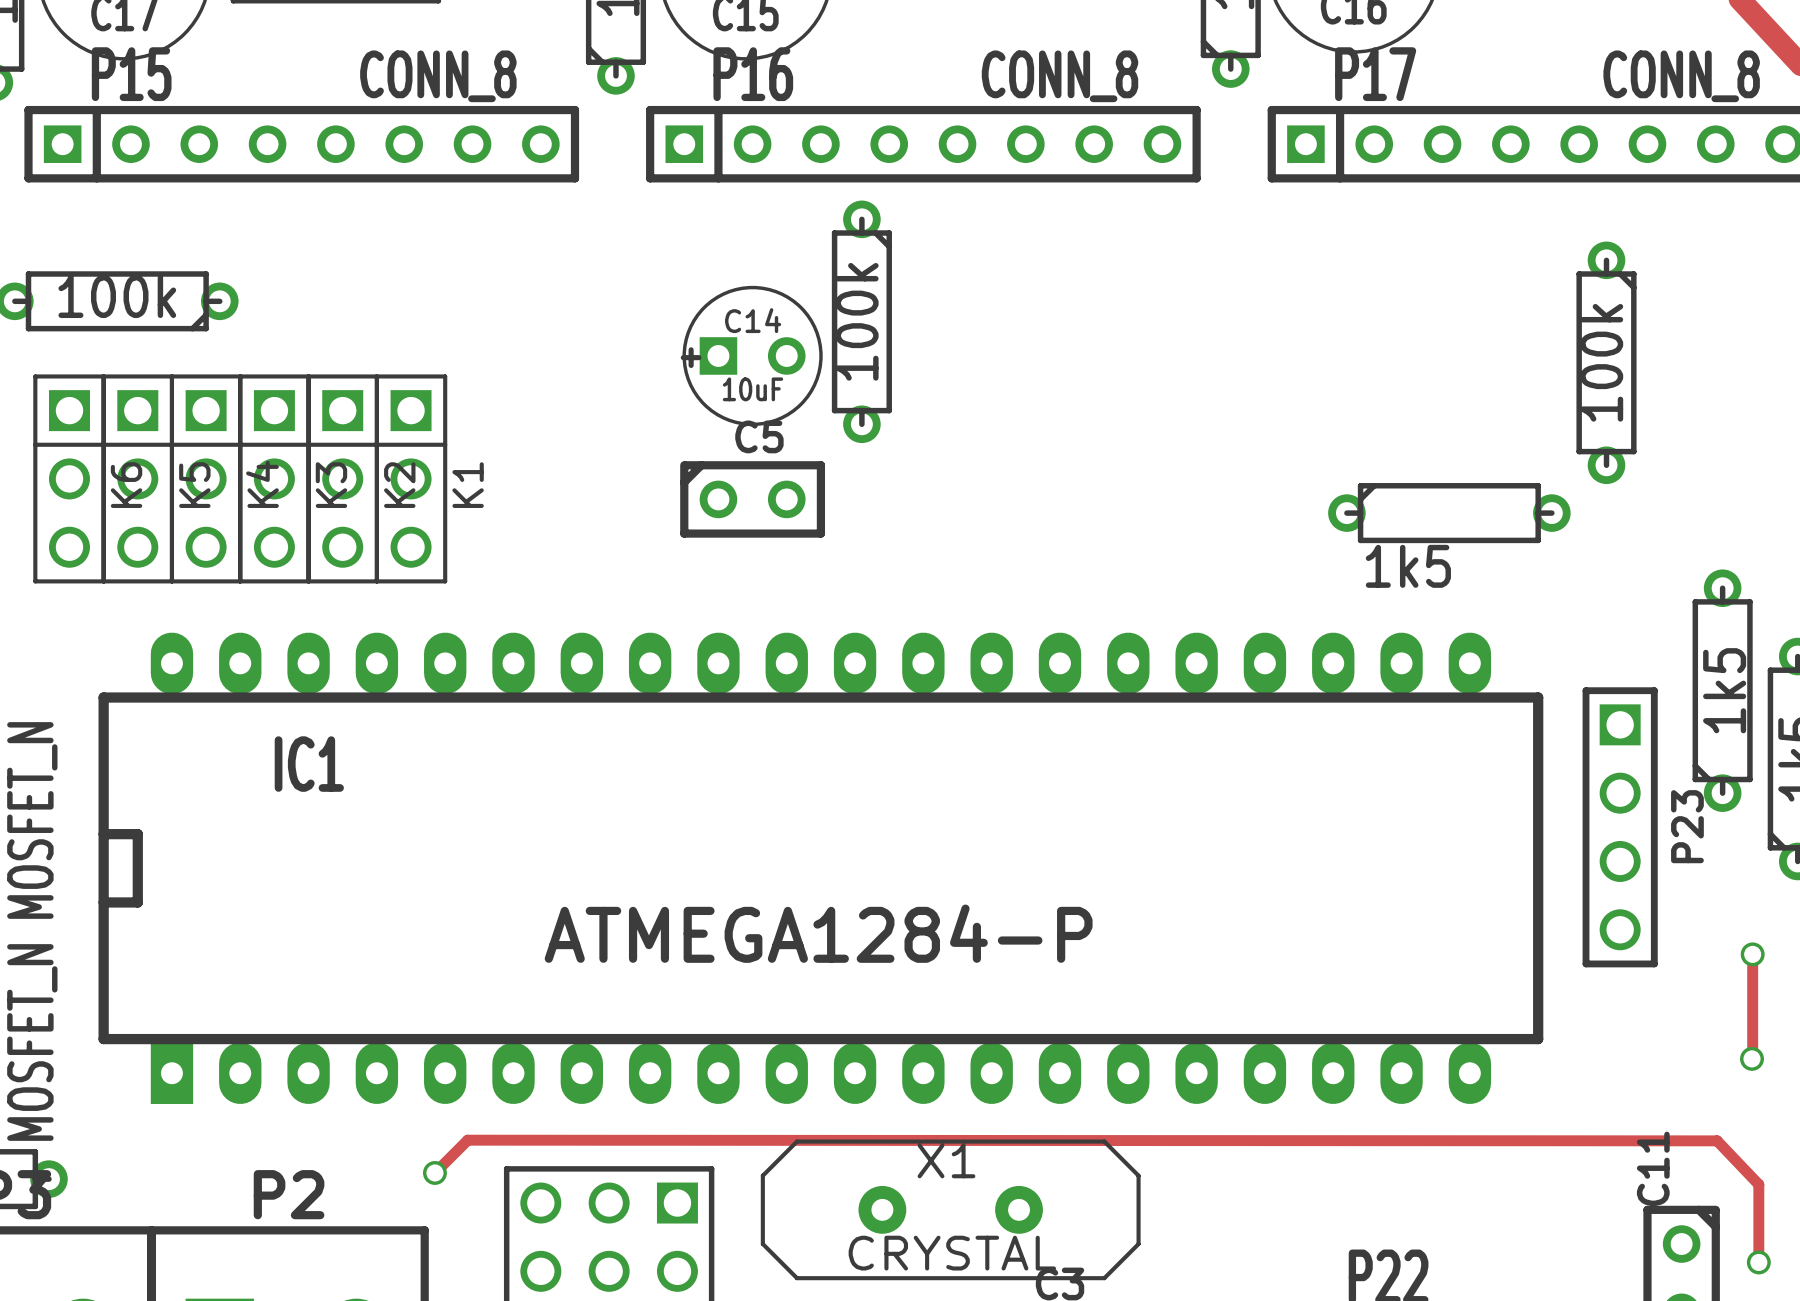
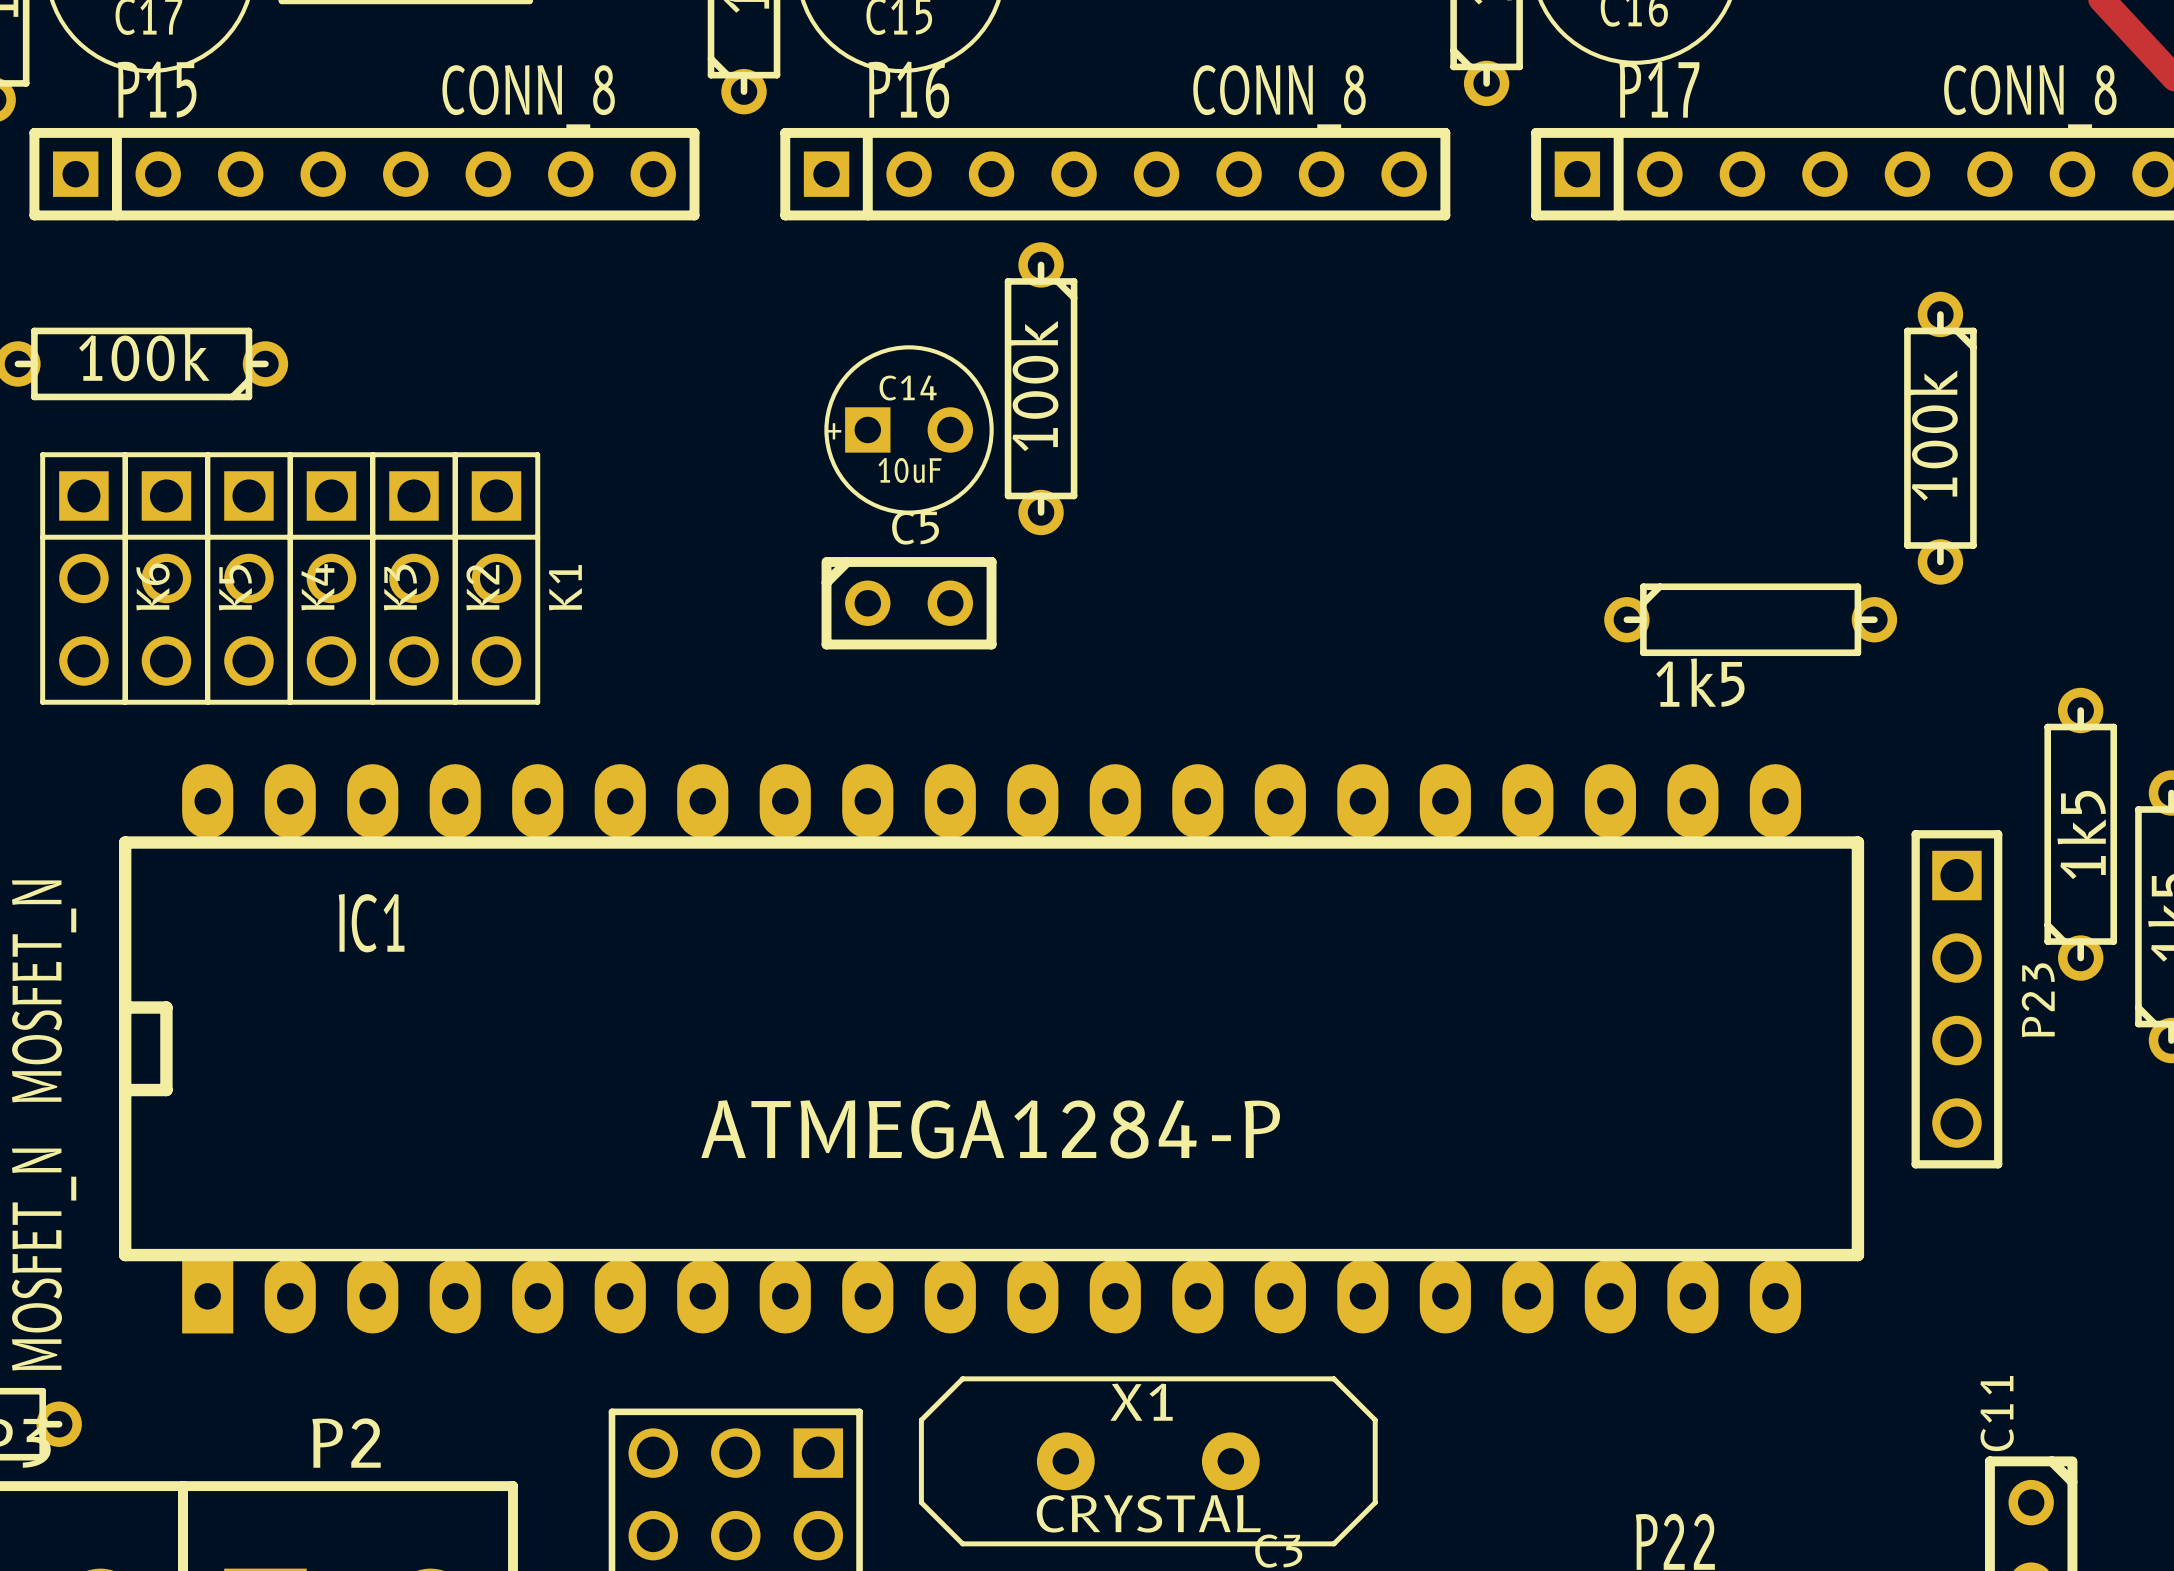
track: (1752, 954) (1752, 1058) -> none
via: (1752, 954) -> none
via: (1752, 1058) -> none
track: (434, 1172) (467, 1140) (1717, 1140) (1758, 1184) (1758, 1262) -> none
via: (434, 1172) -> none
via: (1758, 1262) -> none

